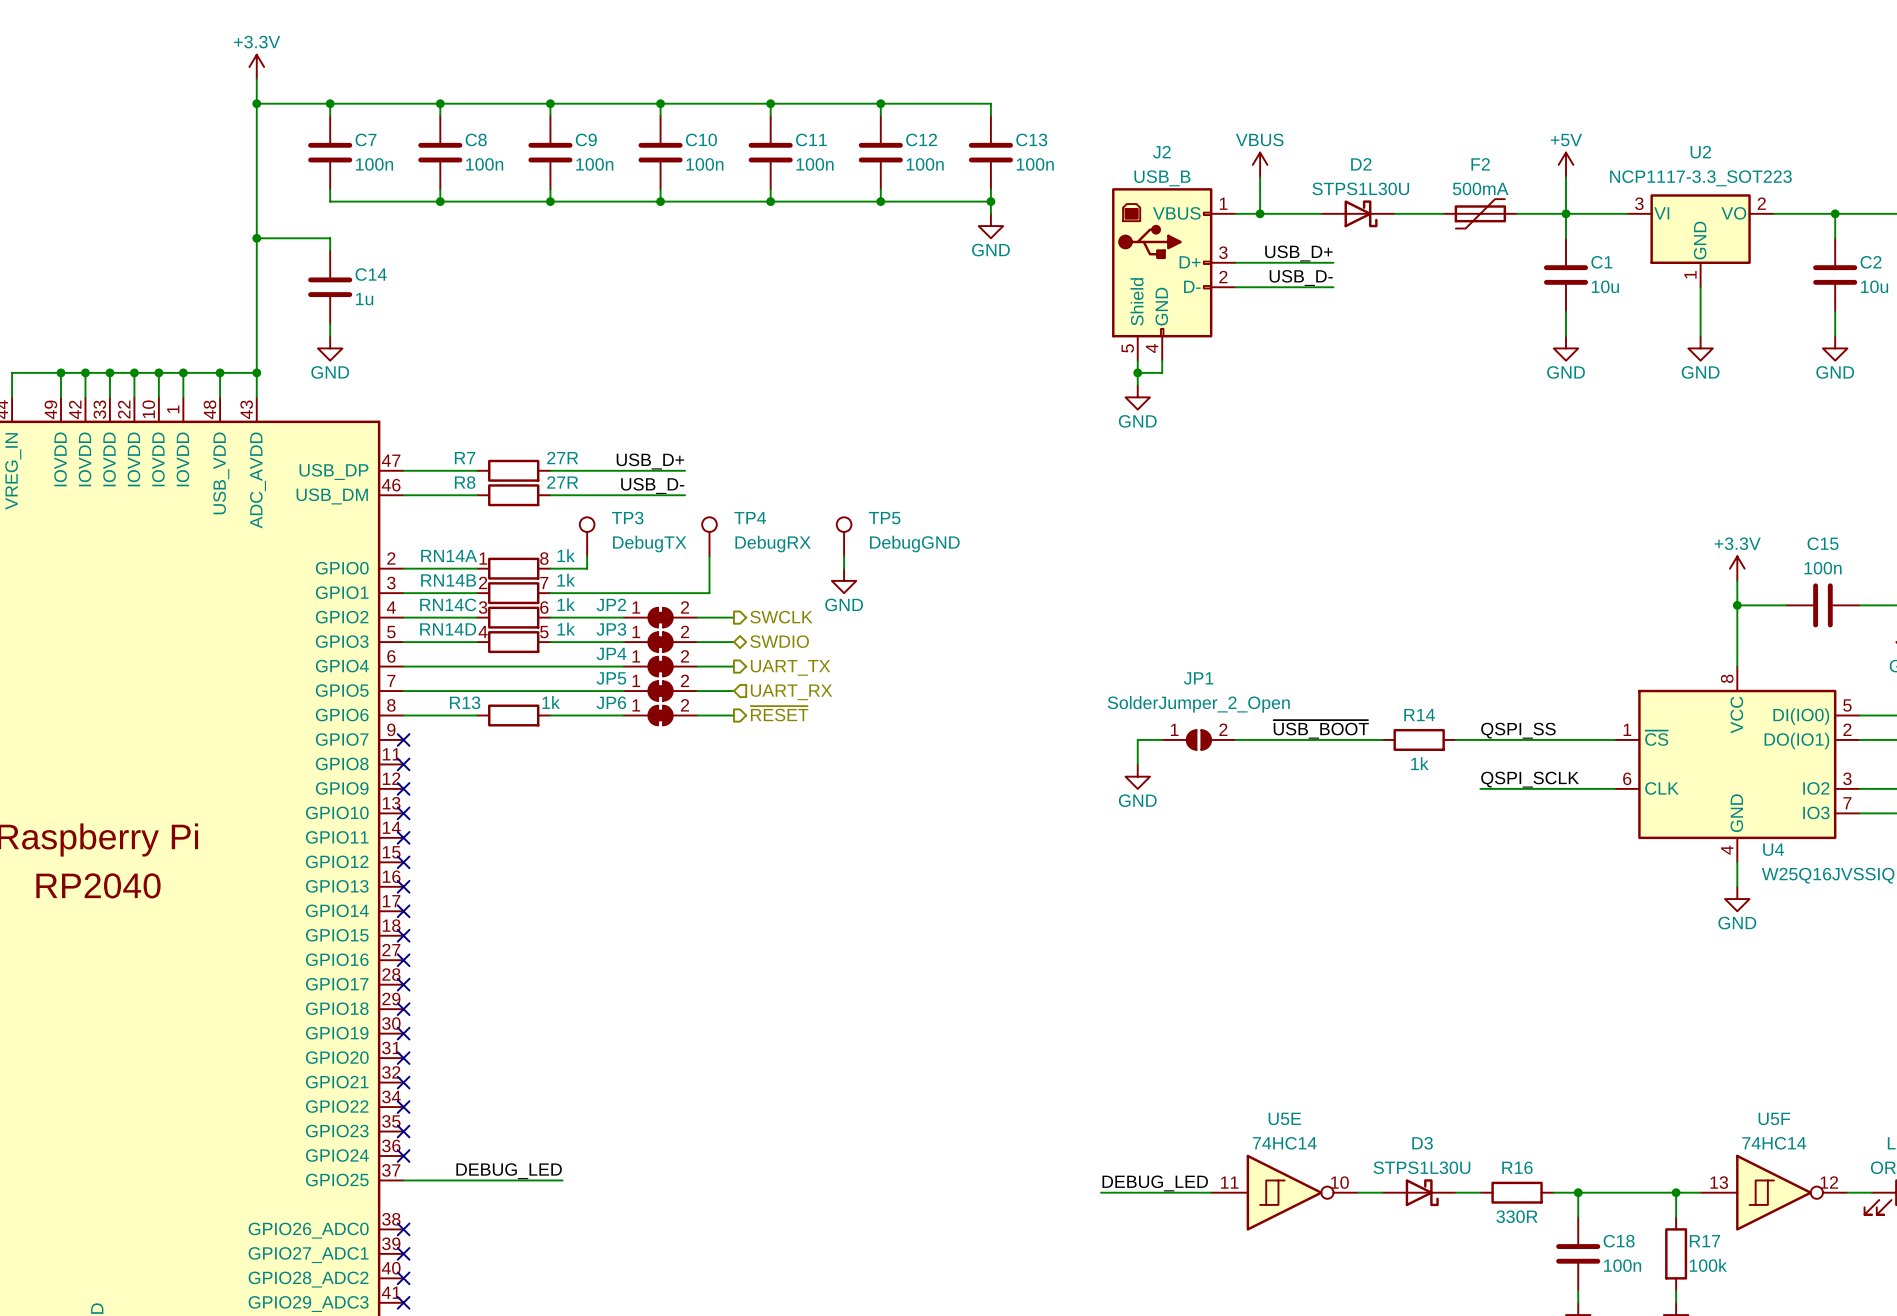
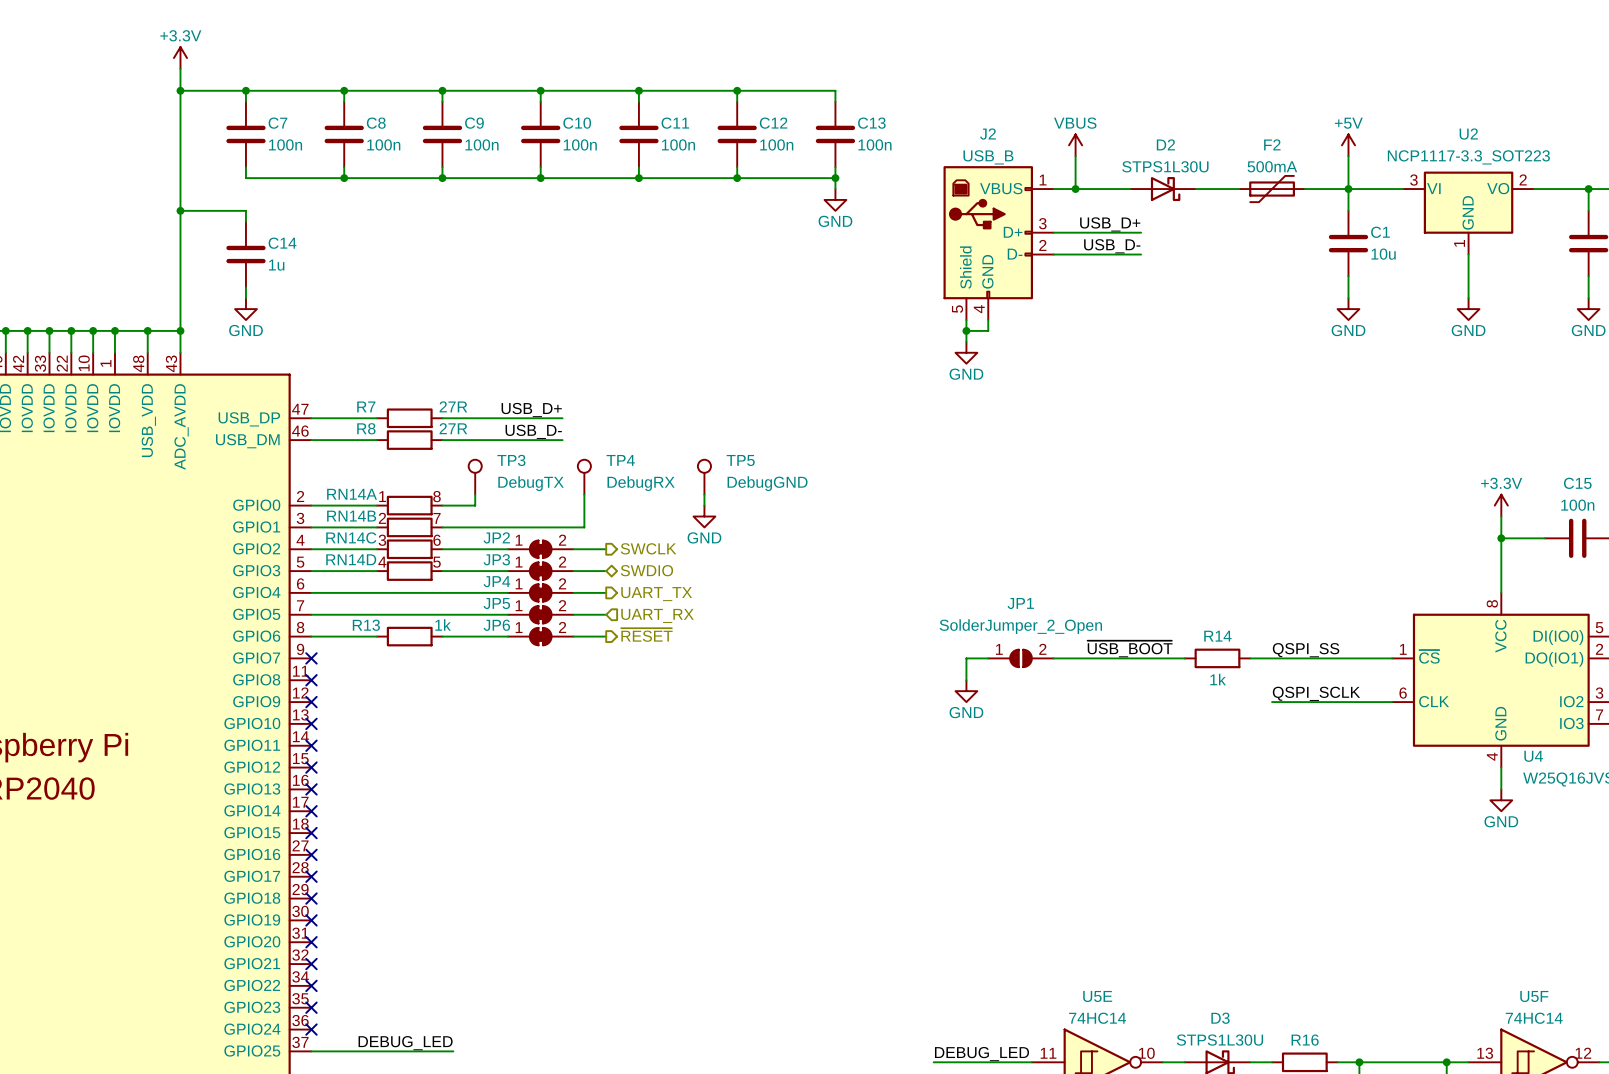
RN14A value: 1k (566, 555) -> none
RN14B value: 1k (566, 580) -> none
RN14C value: 1k (566, 604) -> none
RN14D value: 1k (566, 629) -> none

